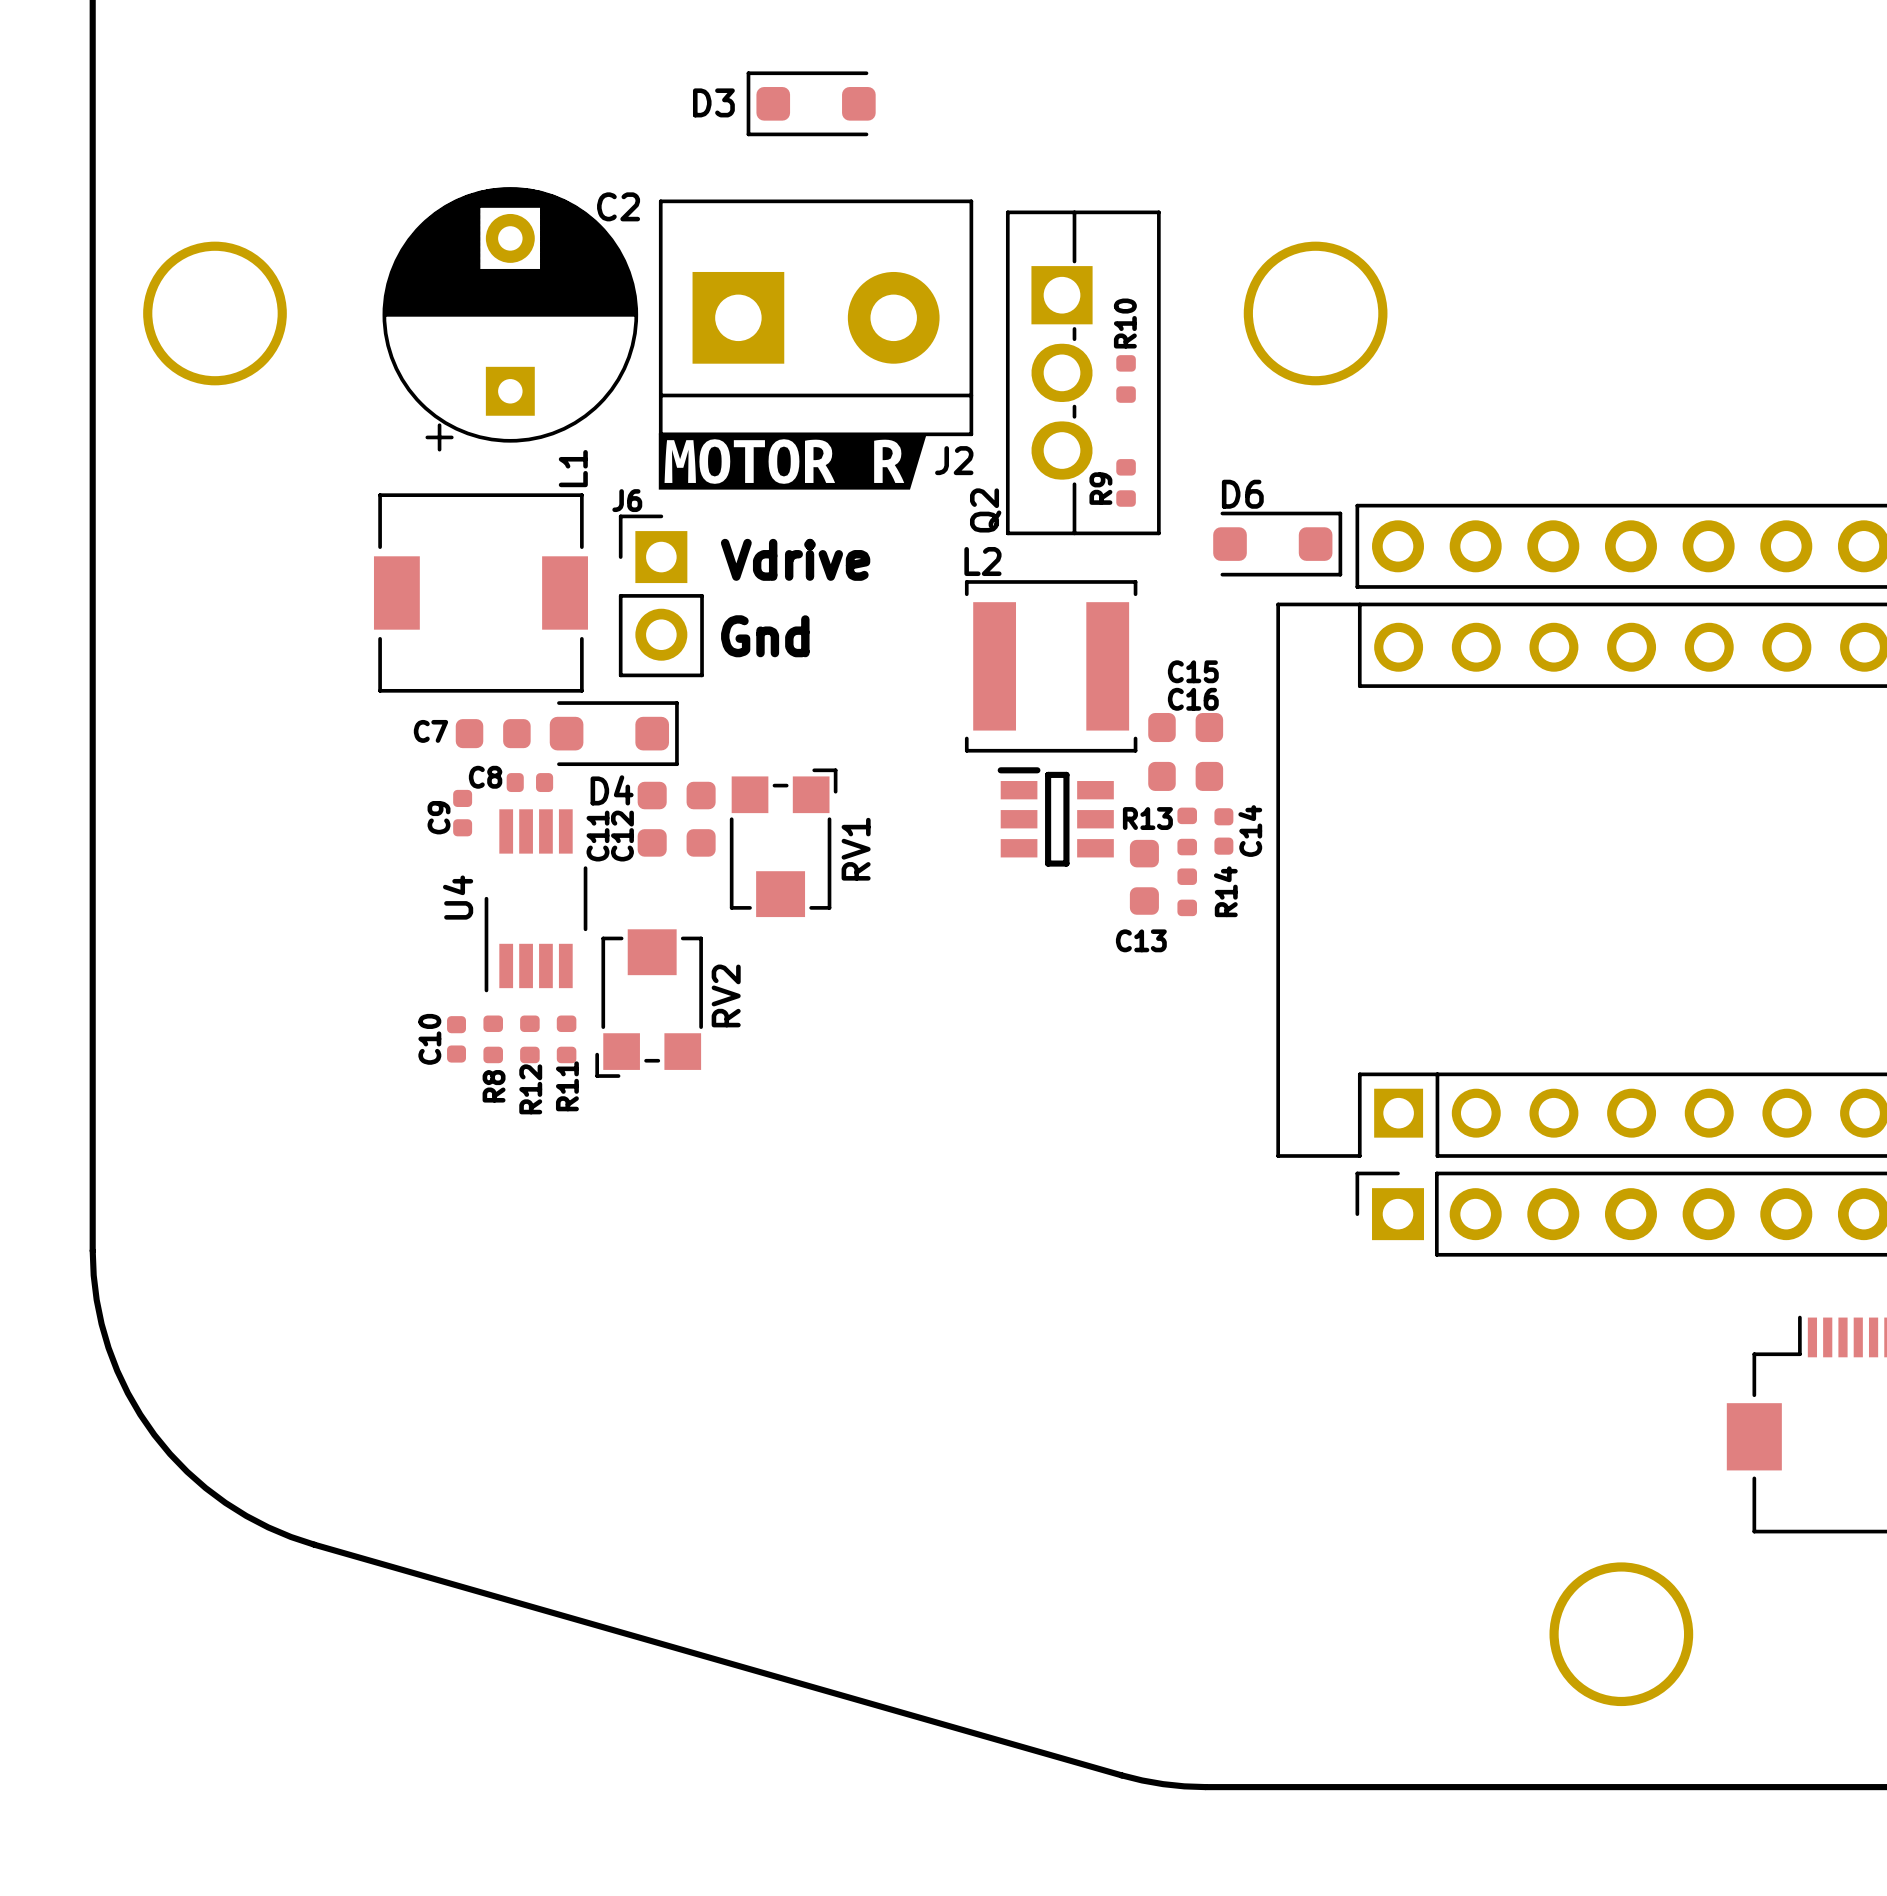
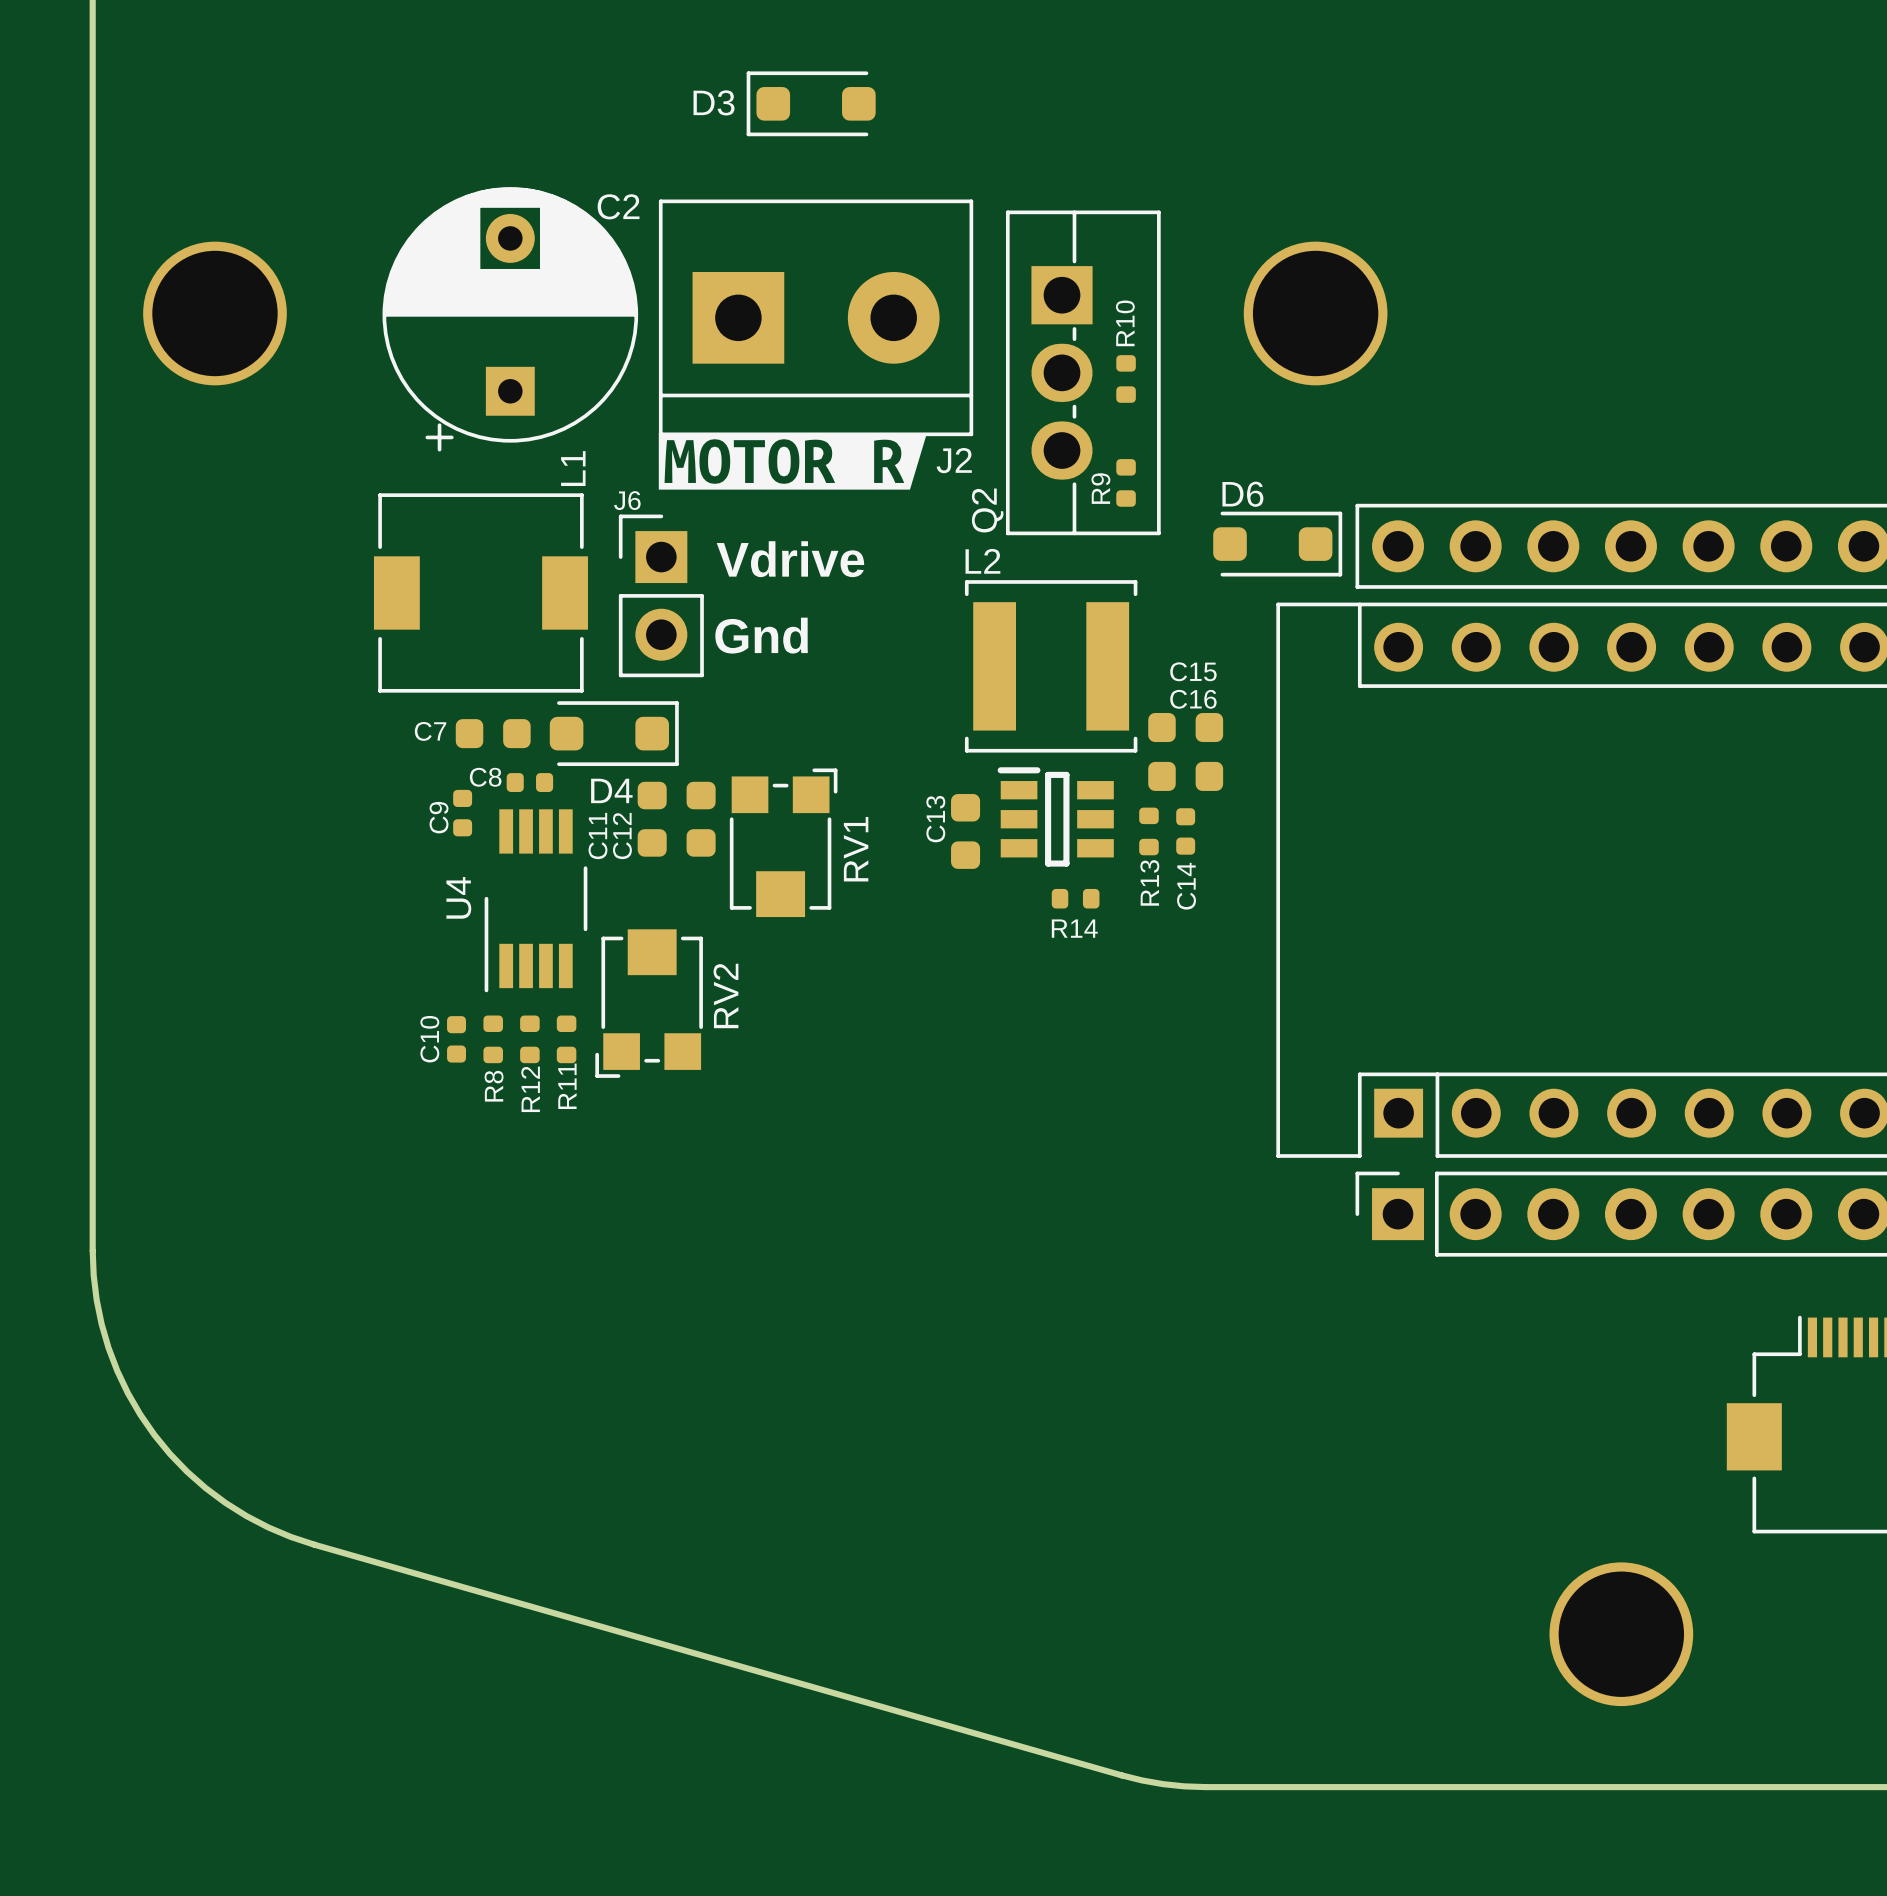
R13 name rotation: 0° (1147, 818) -> 90° counterclockwise (1149, 882)
R13 position: (1187, 831) -> (1148, 831)
C14 position: (1223, 831) -> (1185, 831)
C14 name position: C14 (1250, 831) -> C14 (1186, 886)
C13 position: (1144, 877) -> (965, 831)
R14 rotation: 0° (1187, 892) -> 90° clockwise (1075, 898)
R14 position: (1187, 892) -> (1075, 898)
C13 name rotation: 0° (1141, 940) -> 90° counterclockwise (935, 819)
C13 name position: C13 (1141, 940) -> C13 (935, 819)

